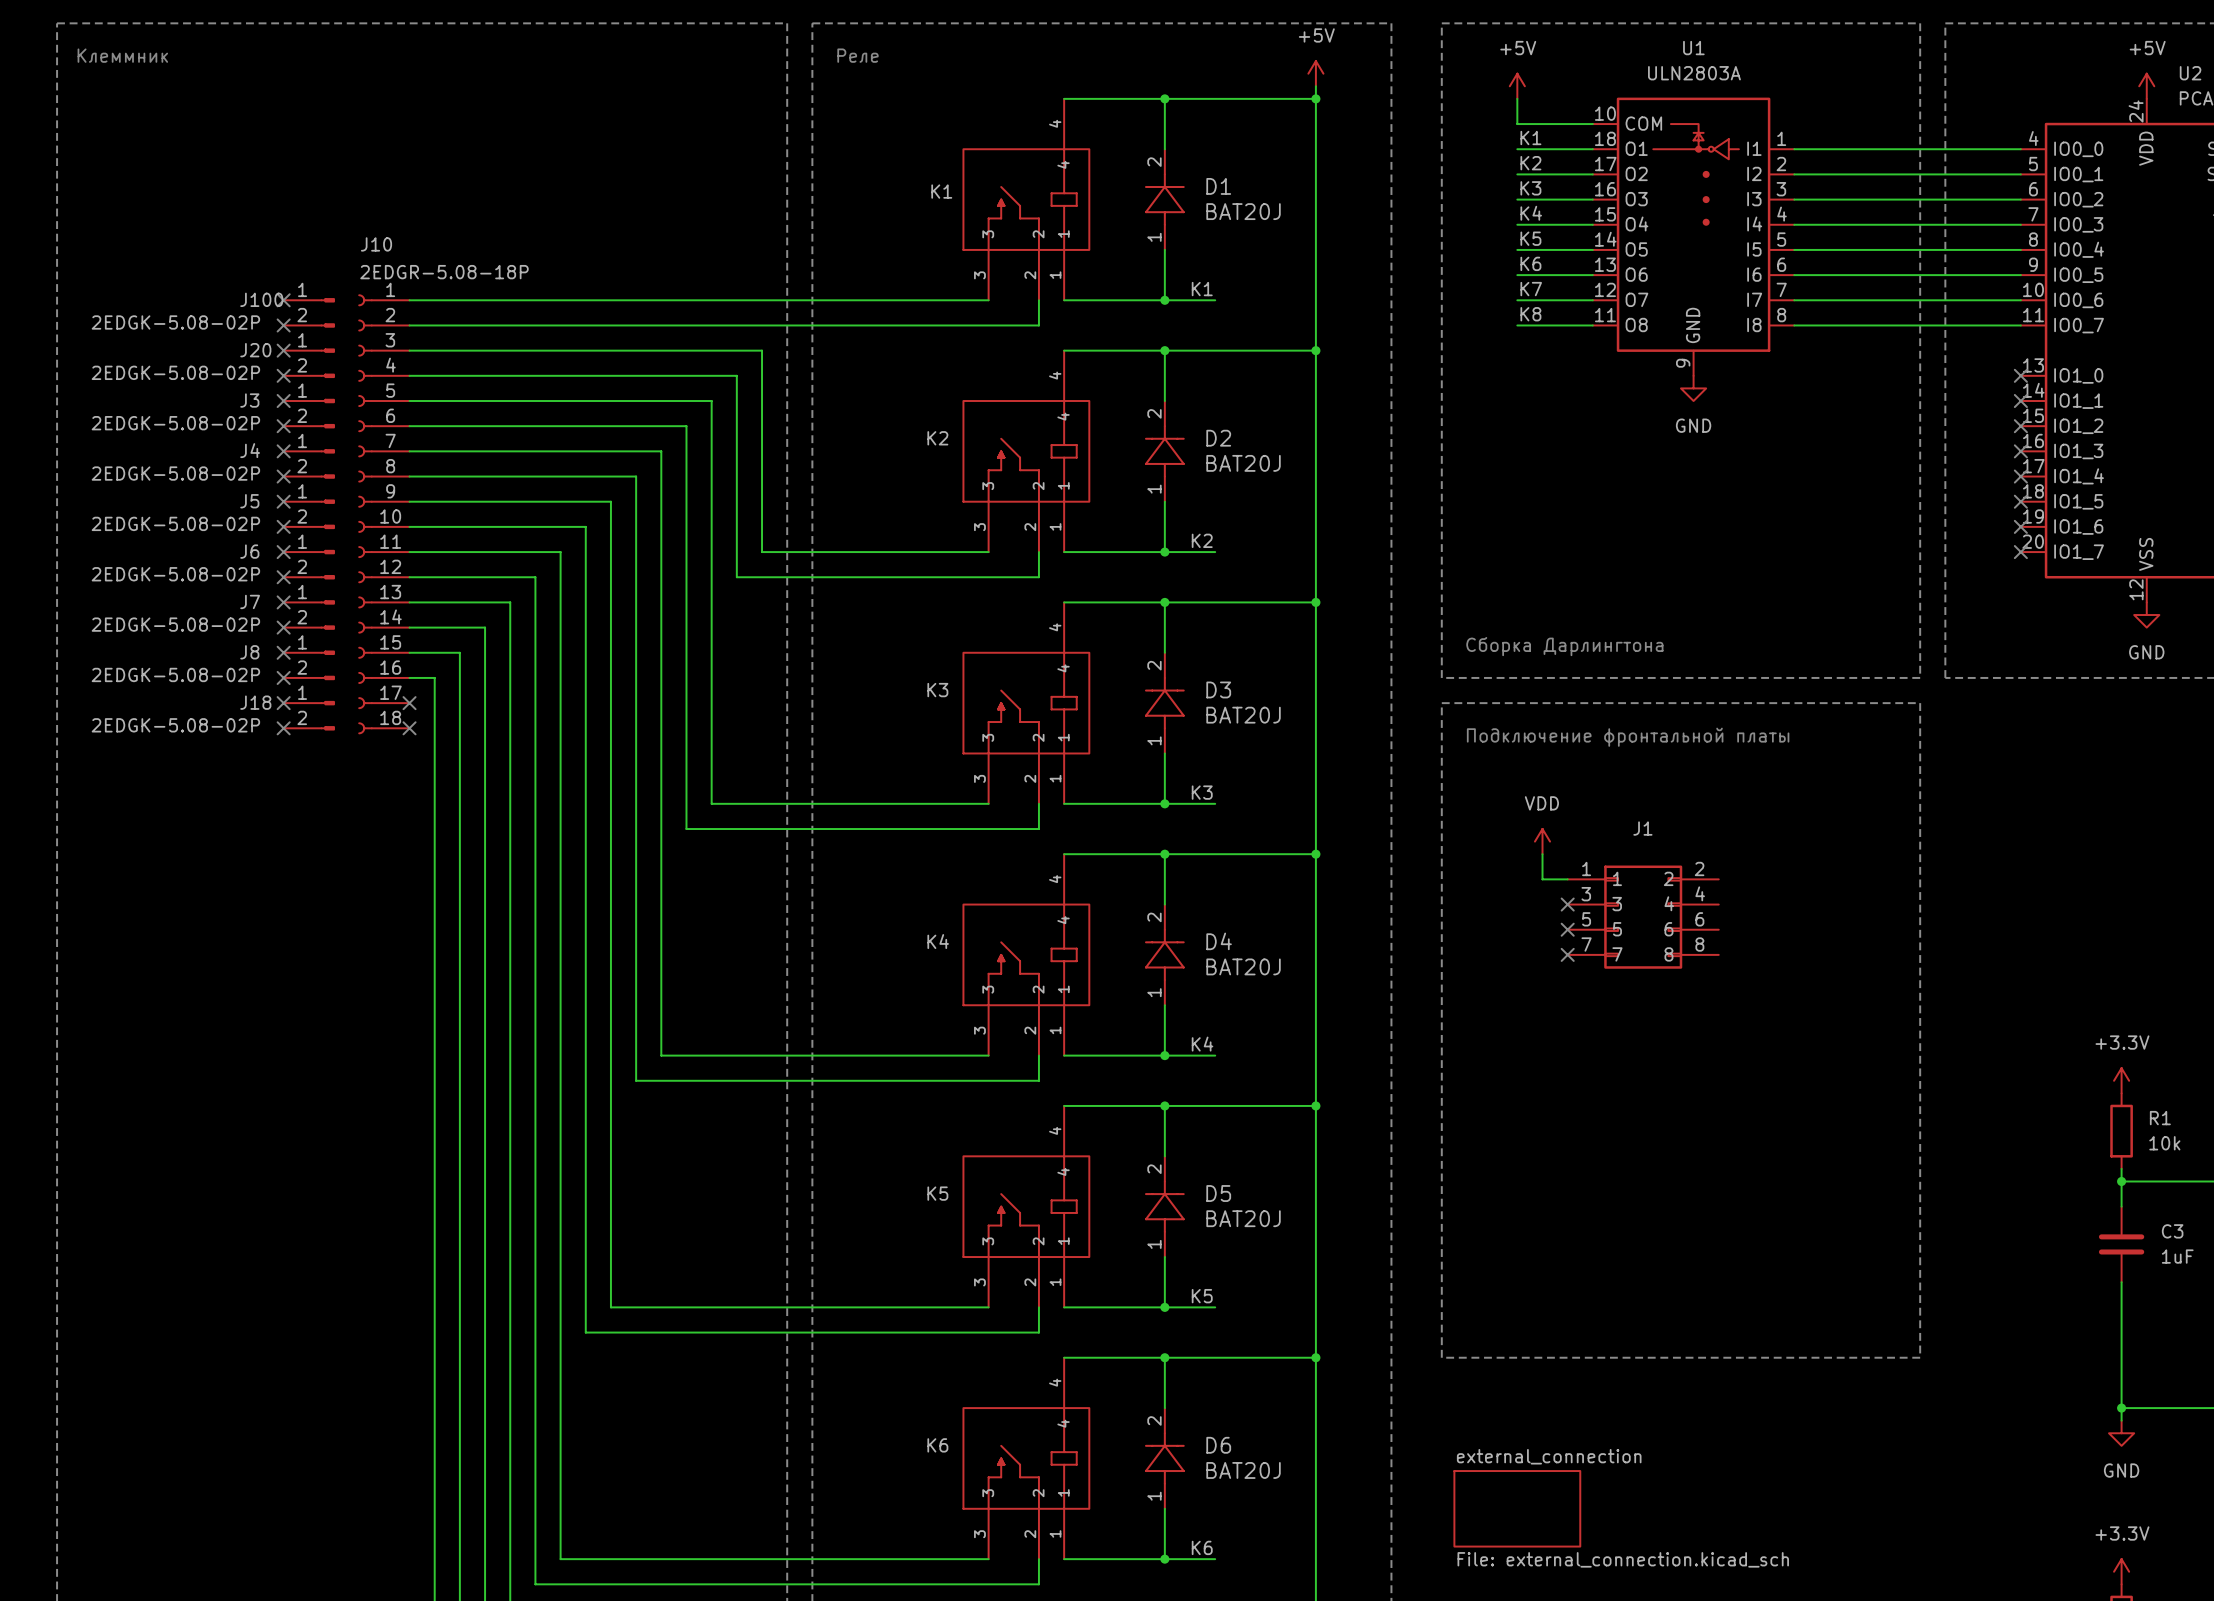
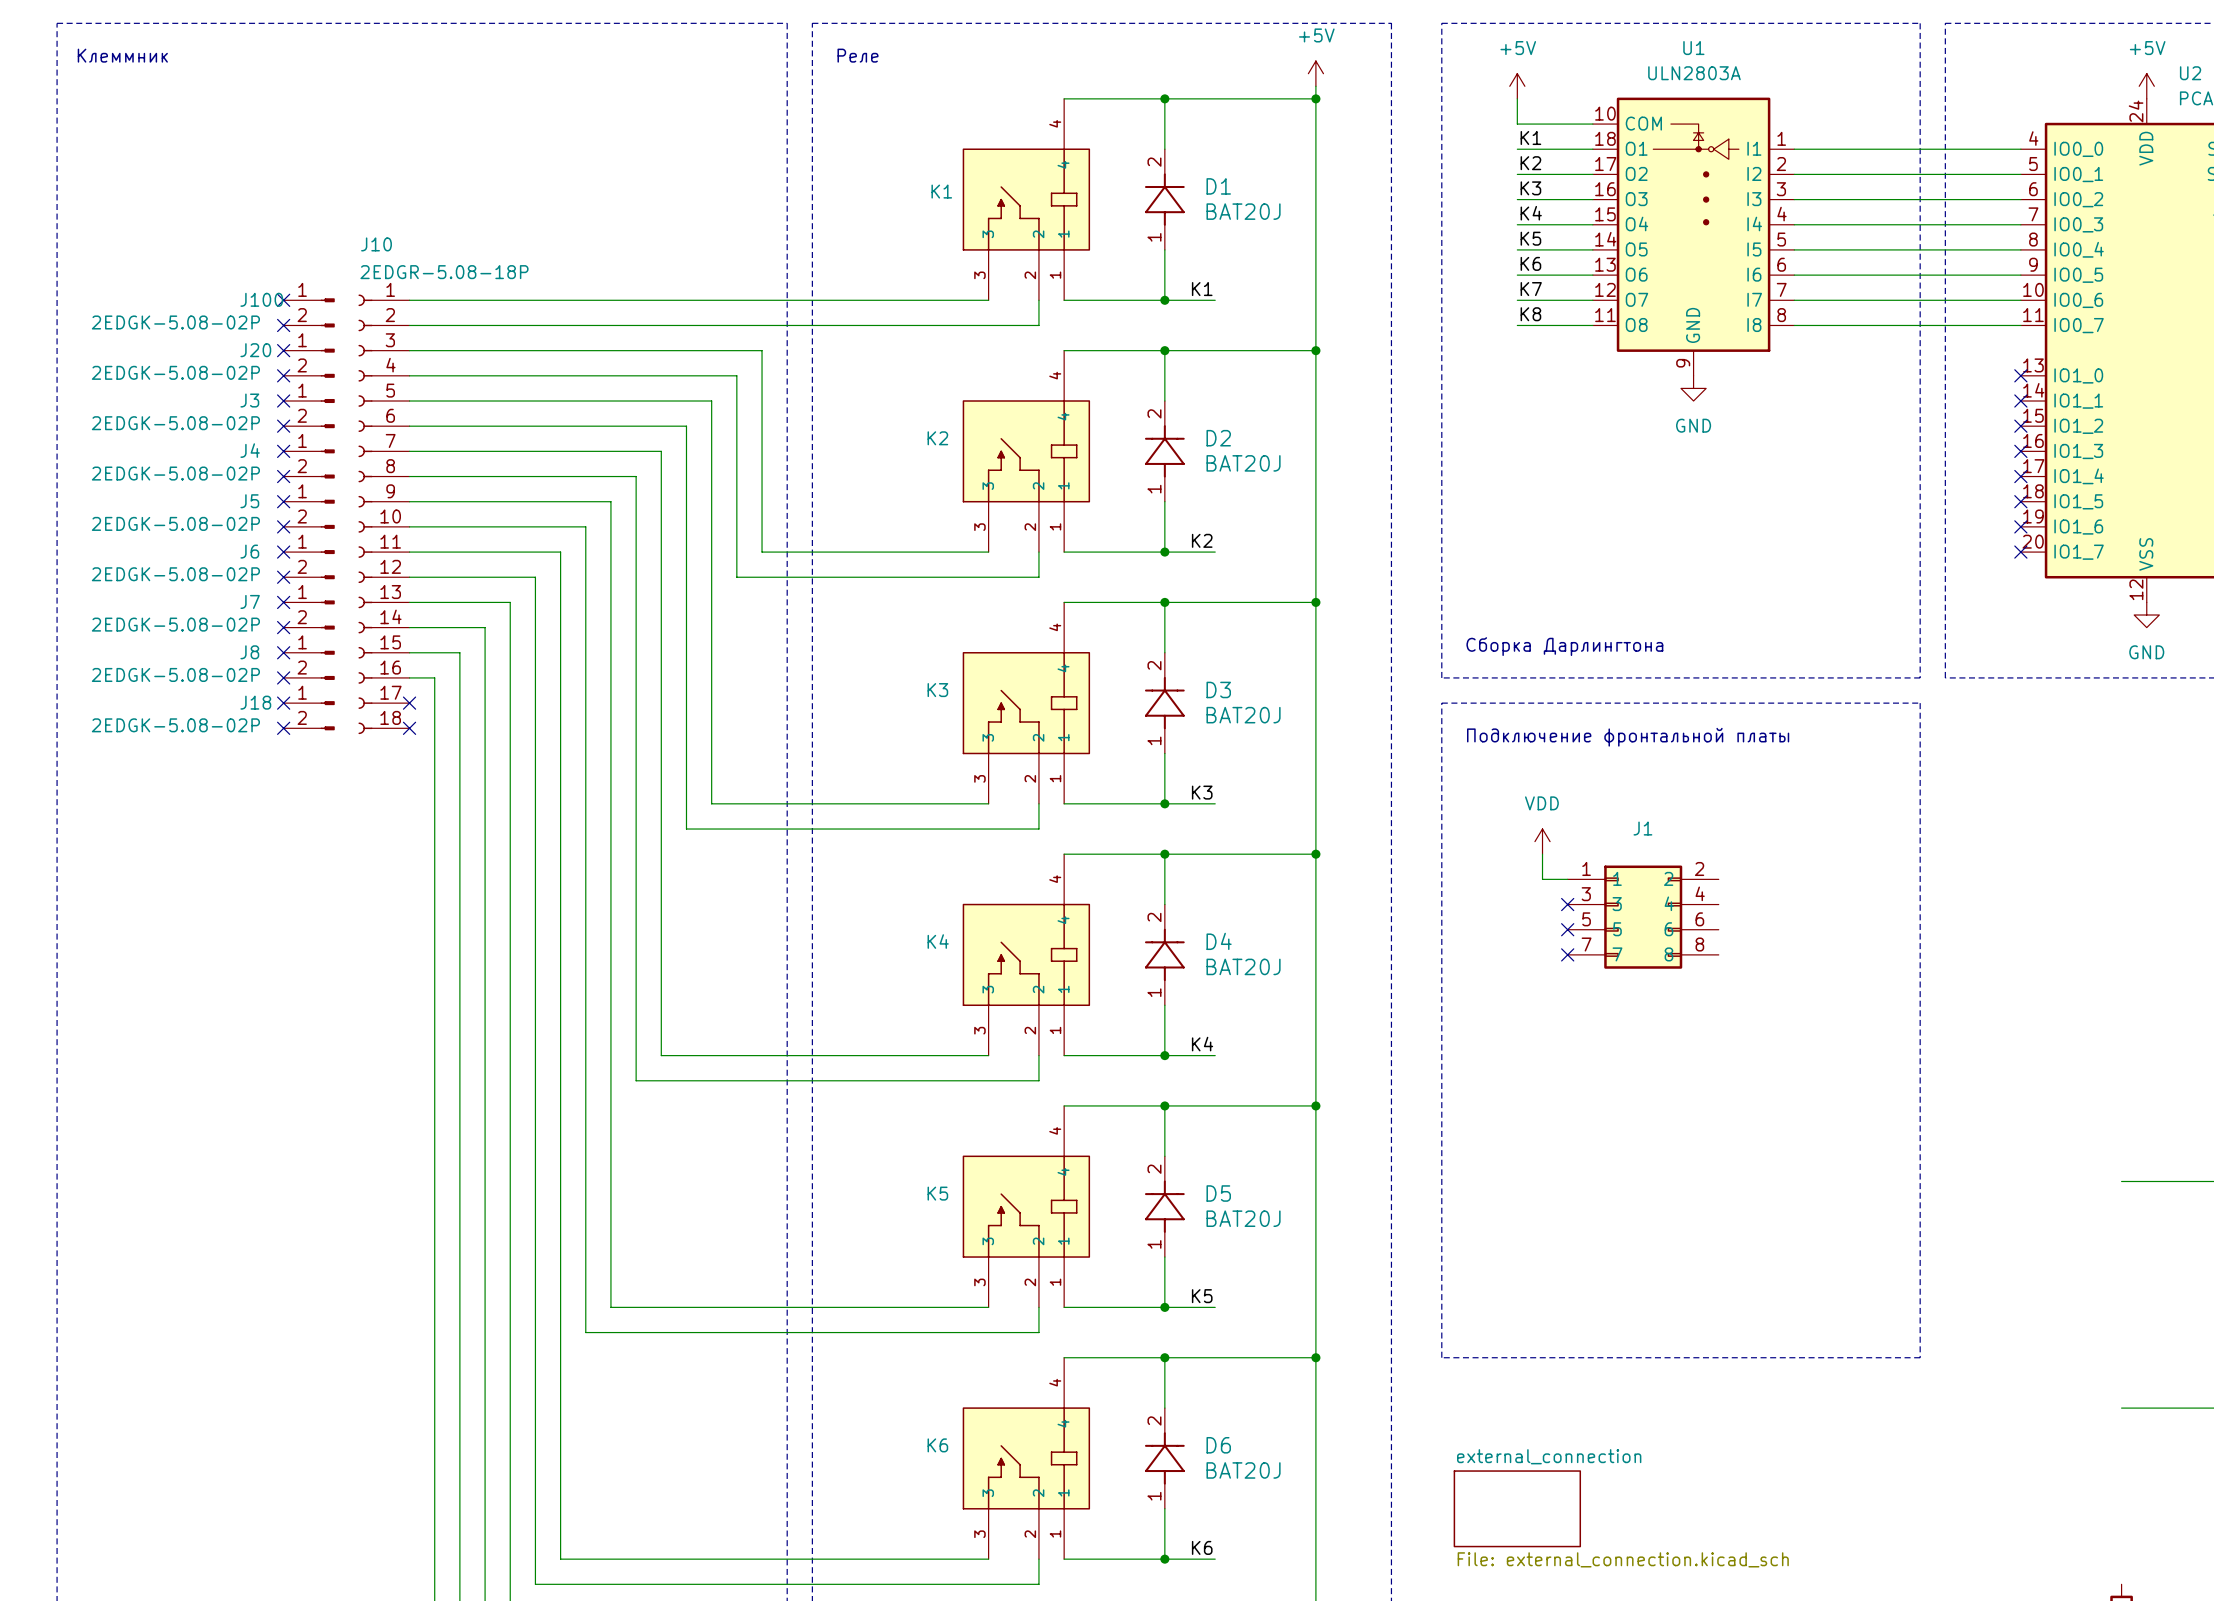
power symbol: +3.3V (2121, 1080) -> none
R1: 10k (2121, 1131) -> none
wire: (2121, 1168) (2121, 1206) -> none
junction: (2121, 1181) -> none
C3: 1uF (2121, 1244) -> none
wire: (2121, 1282) (2121, 1420) -> none
junction: (2121, 1408) -> none
power symbol: GND (2121, 1433) -> none
power symbol: +3.3V (2121, 1571) -> none

